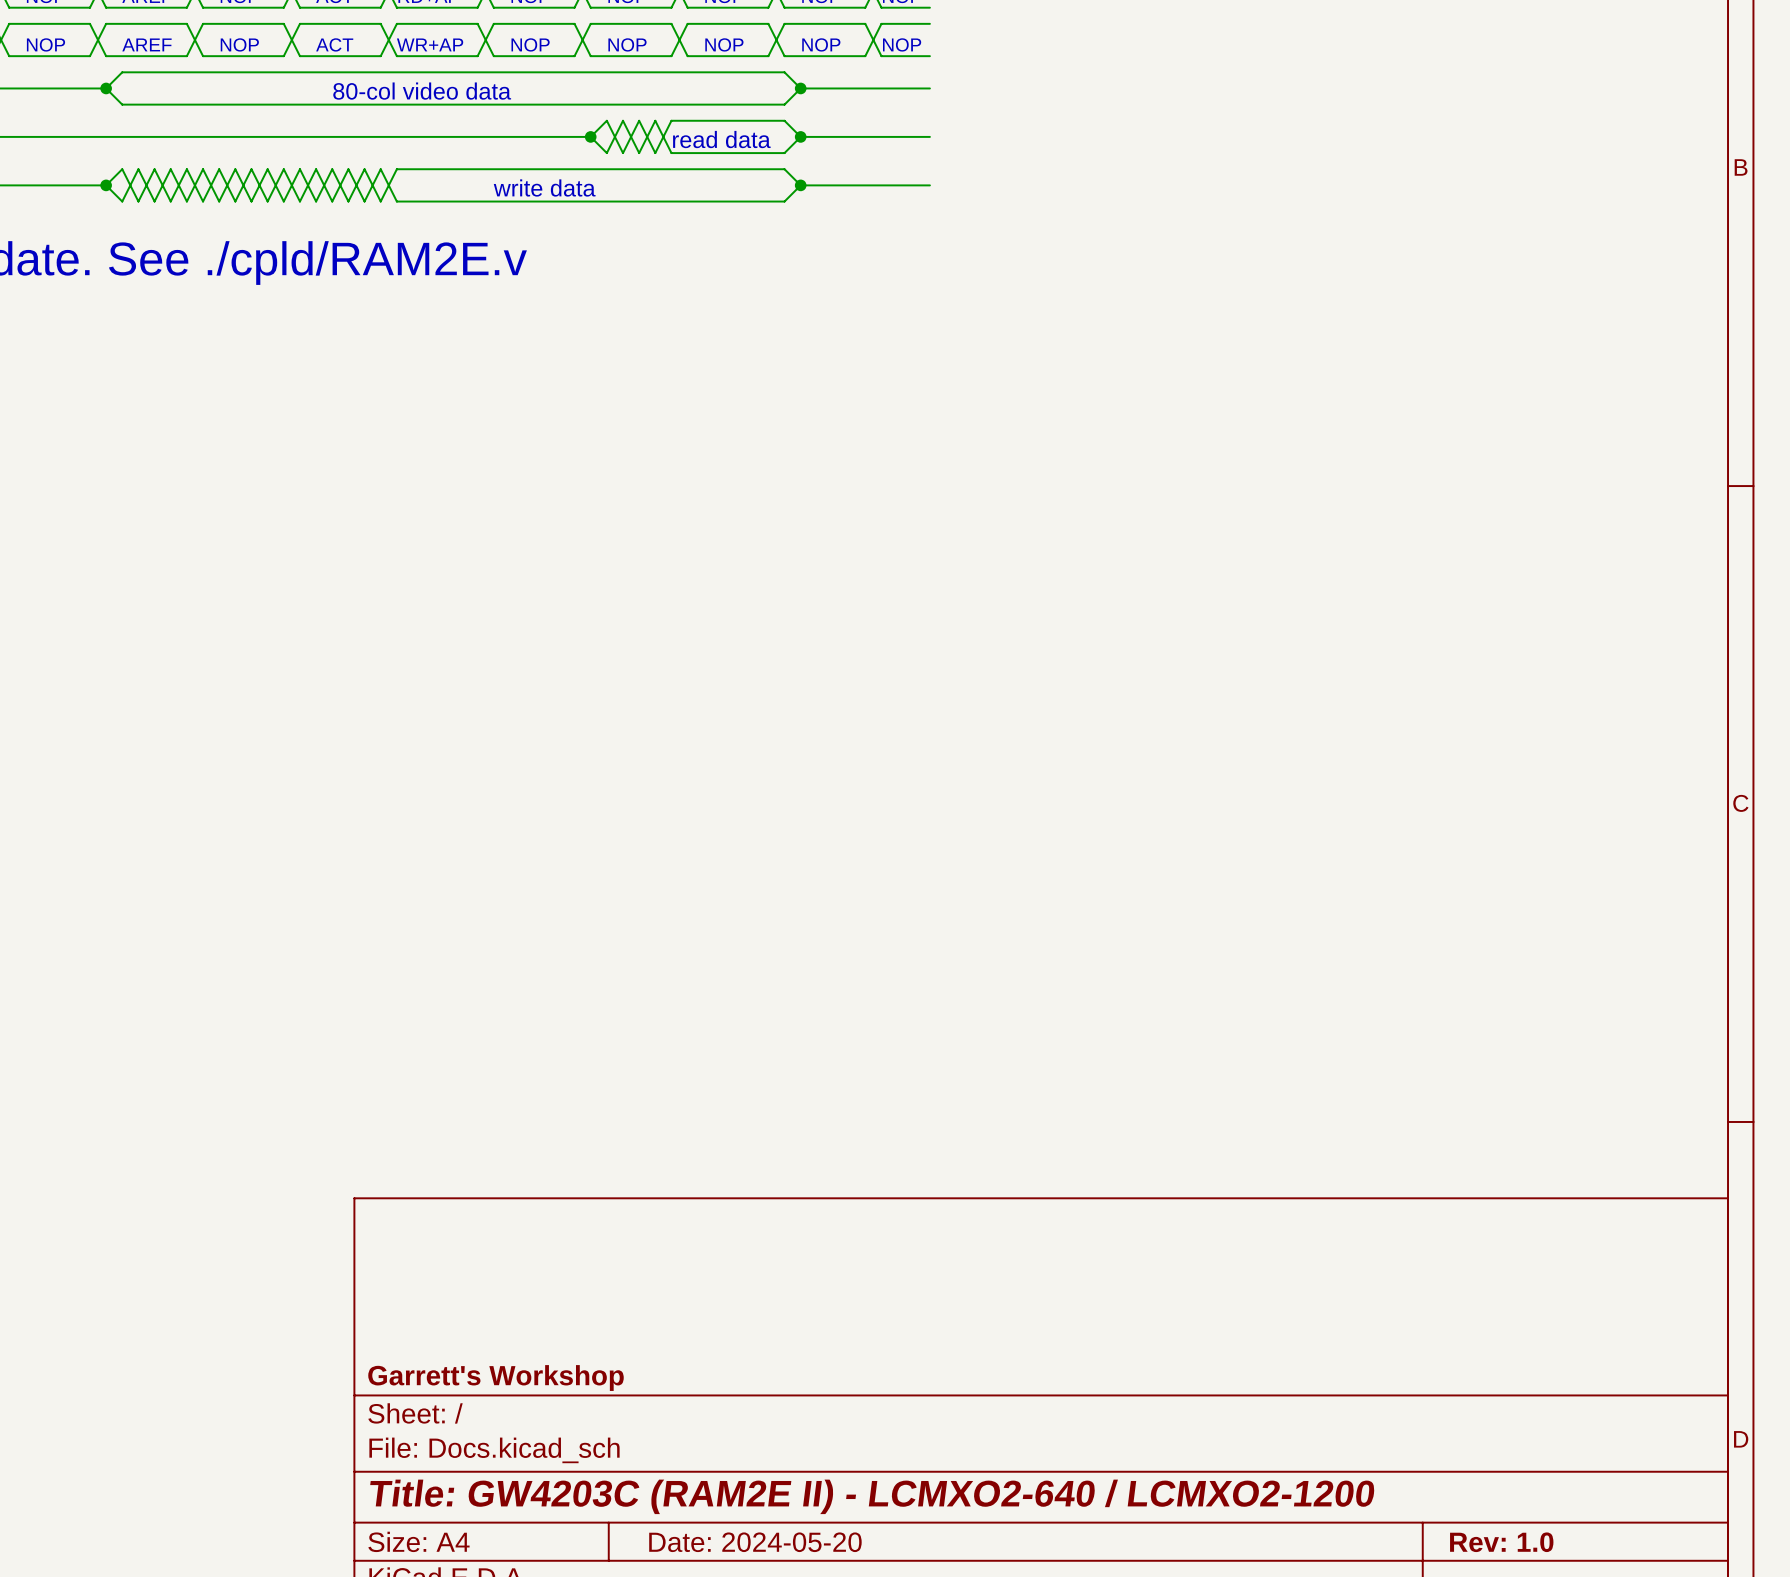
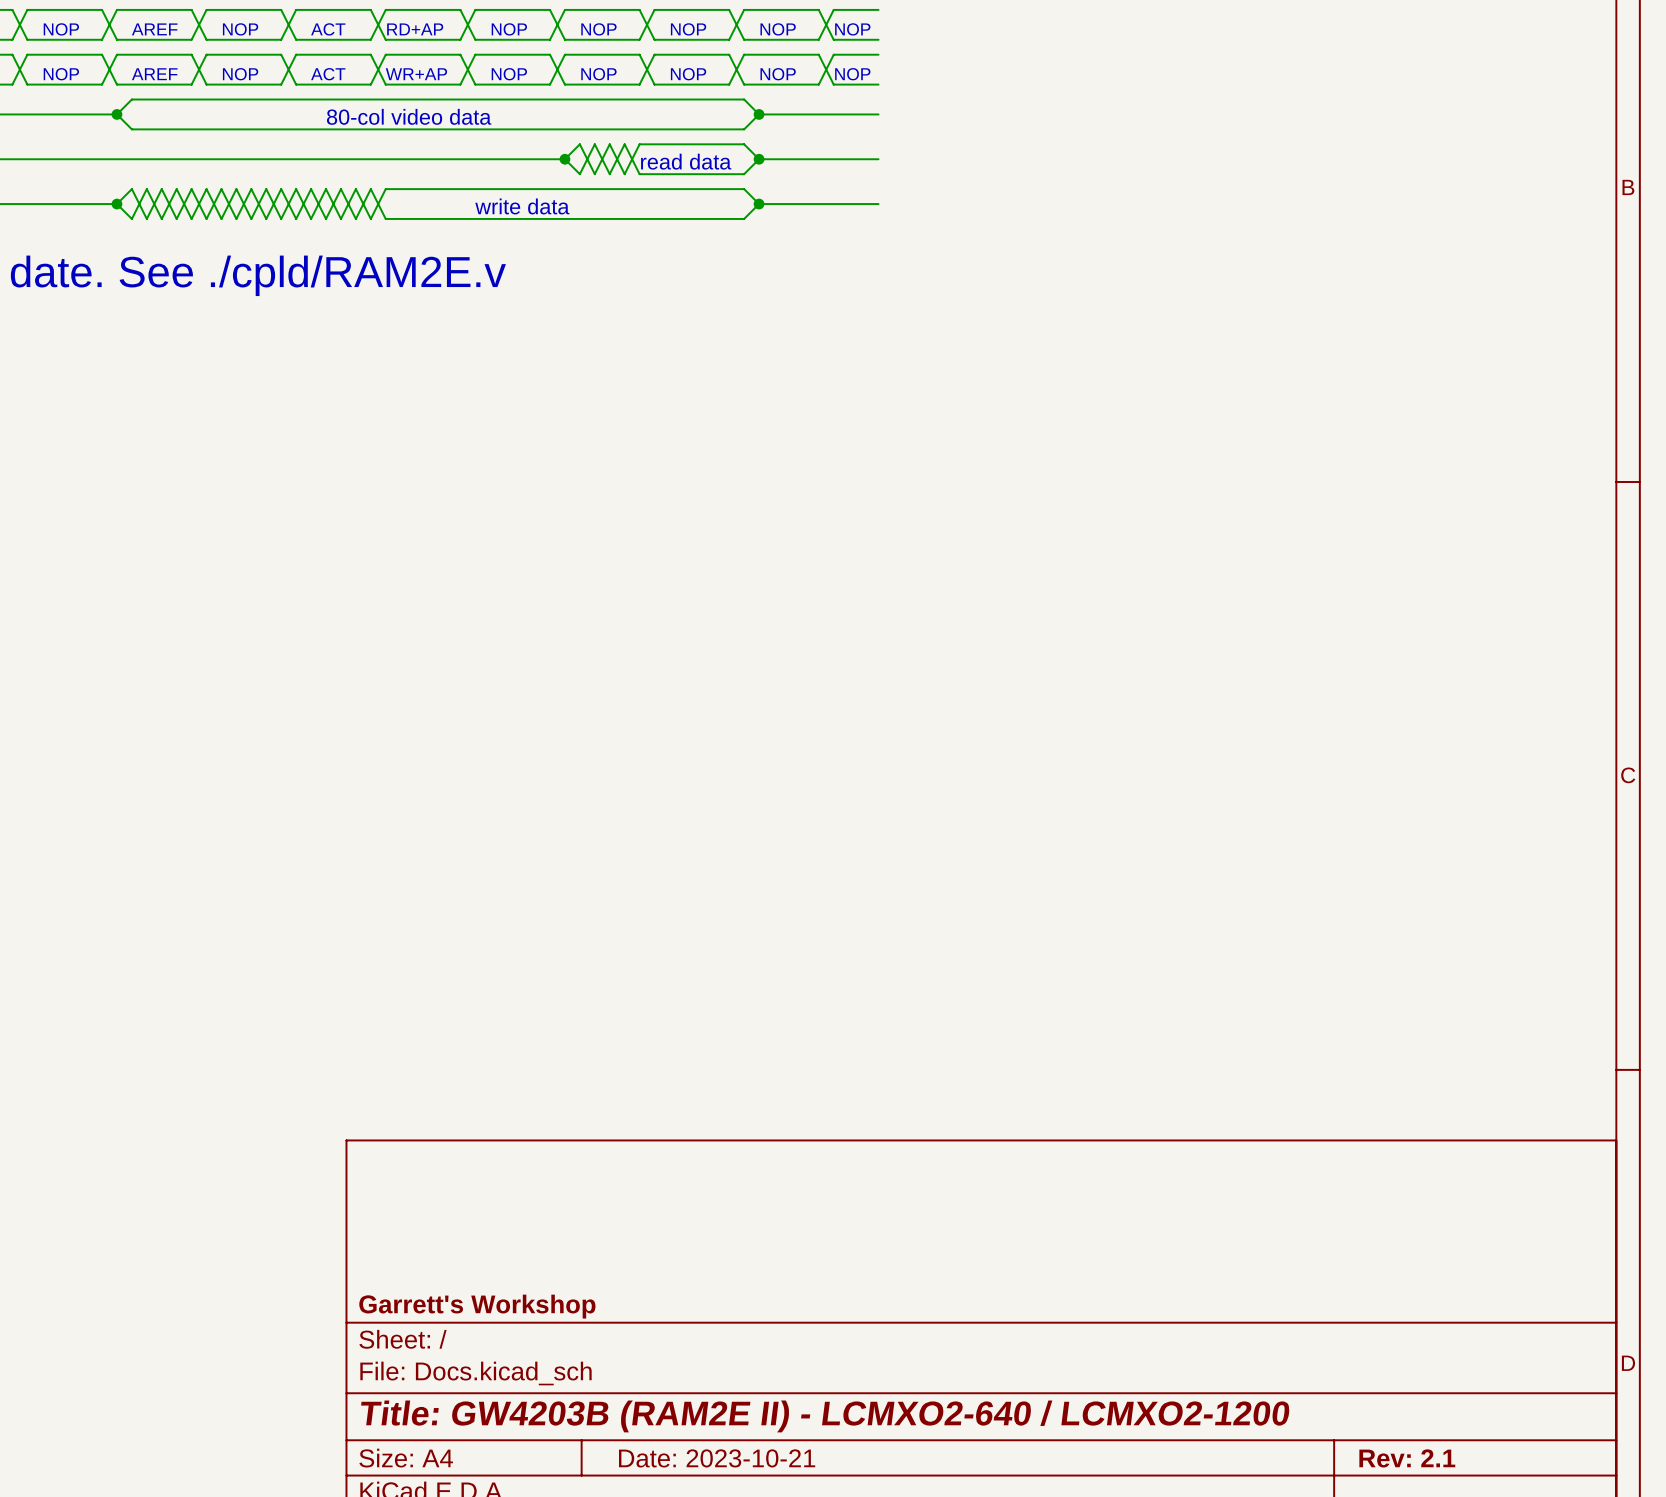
title block: Title: GW4203C (RAM2E II) - LCMXO2-640 / LCMXO2-1200 (872, 1496) -> Title: GW4203B (RAM2E II) - LCMXO2-640 / LCMXO2-1200 (825, 1416)
title block: Date: 2024-05-20 (755, 1542) -> Date: 2023-10-21 (717, 1458)
title block: Rev: 1.0 (1501, 1542) -> Rev: 2.1 (1407, 1458)

